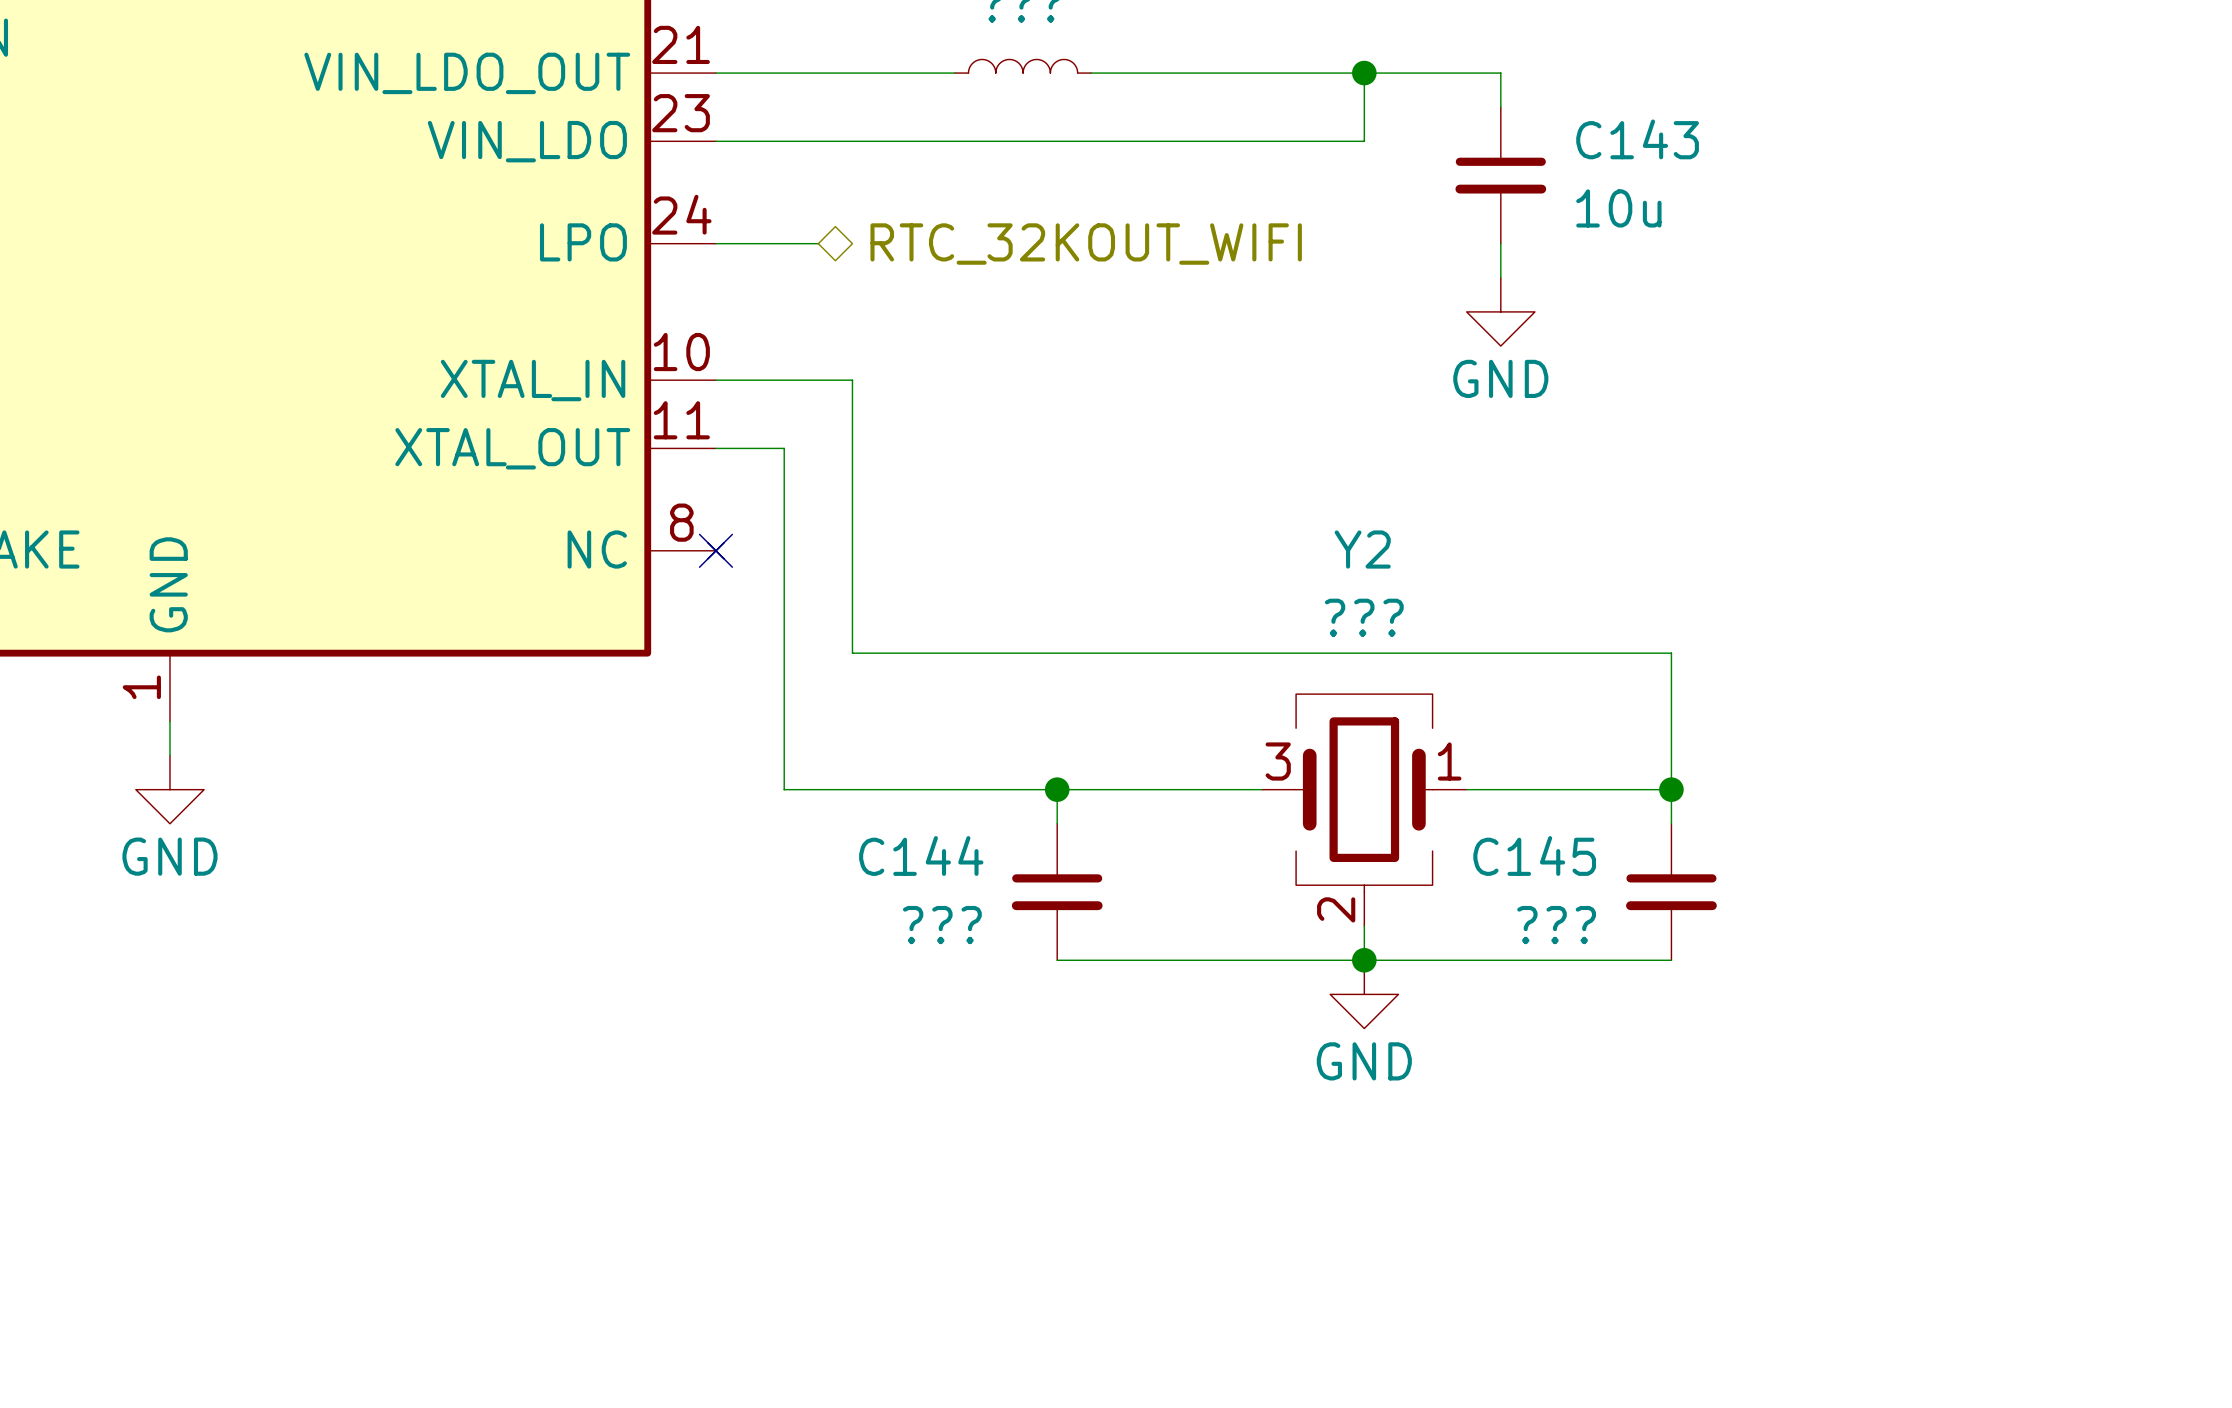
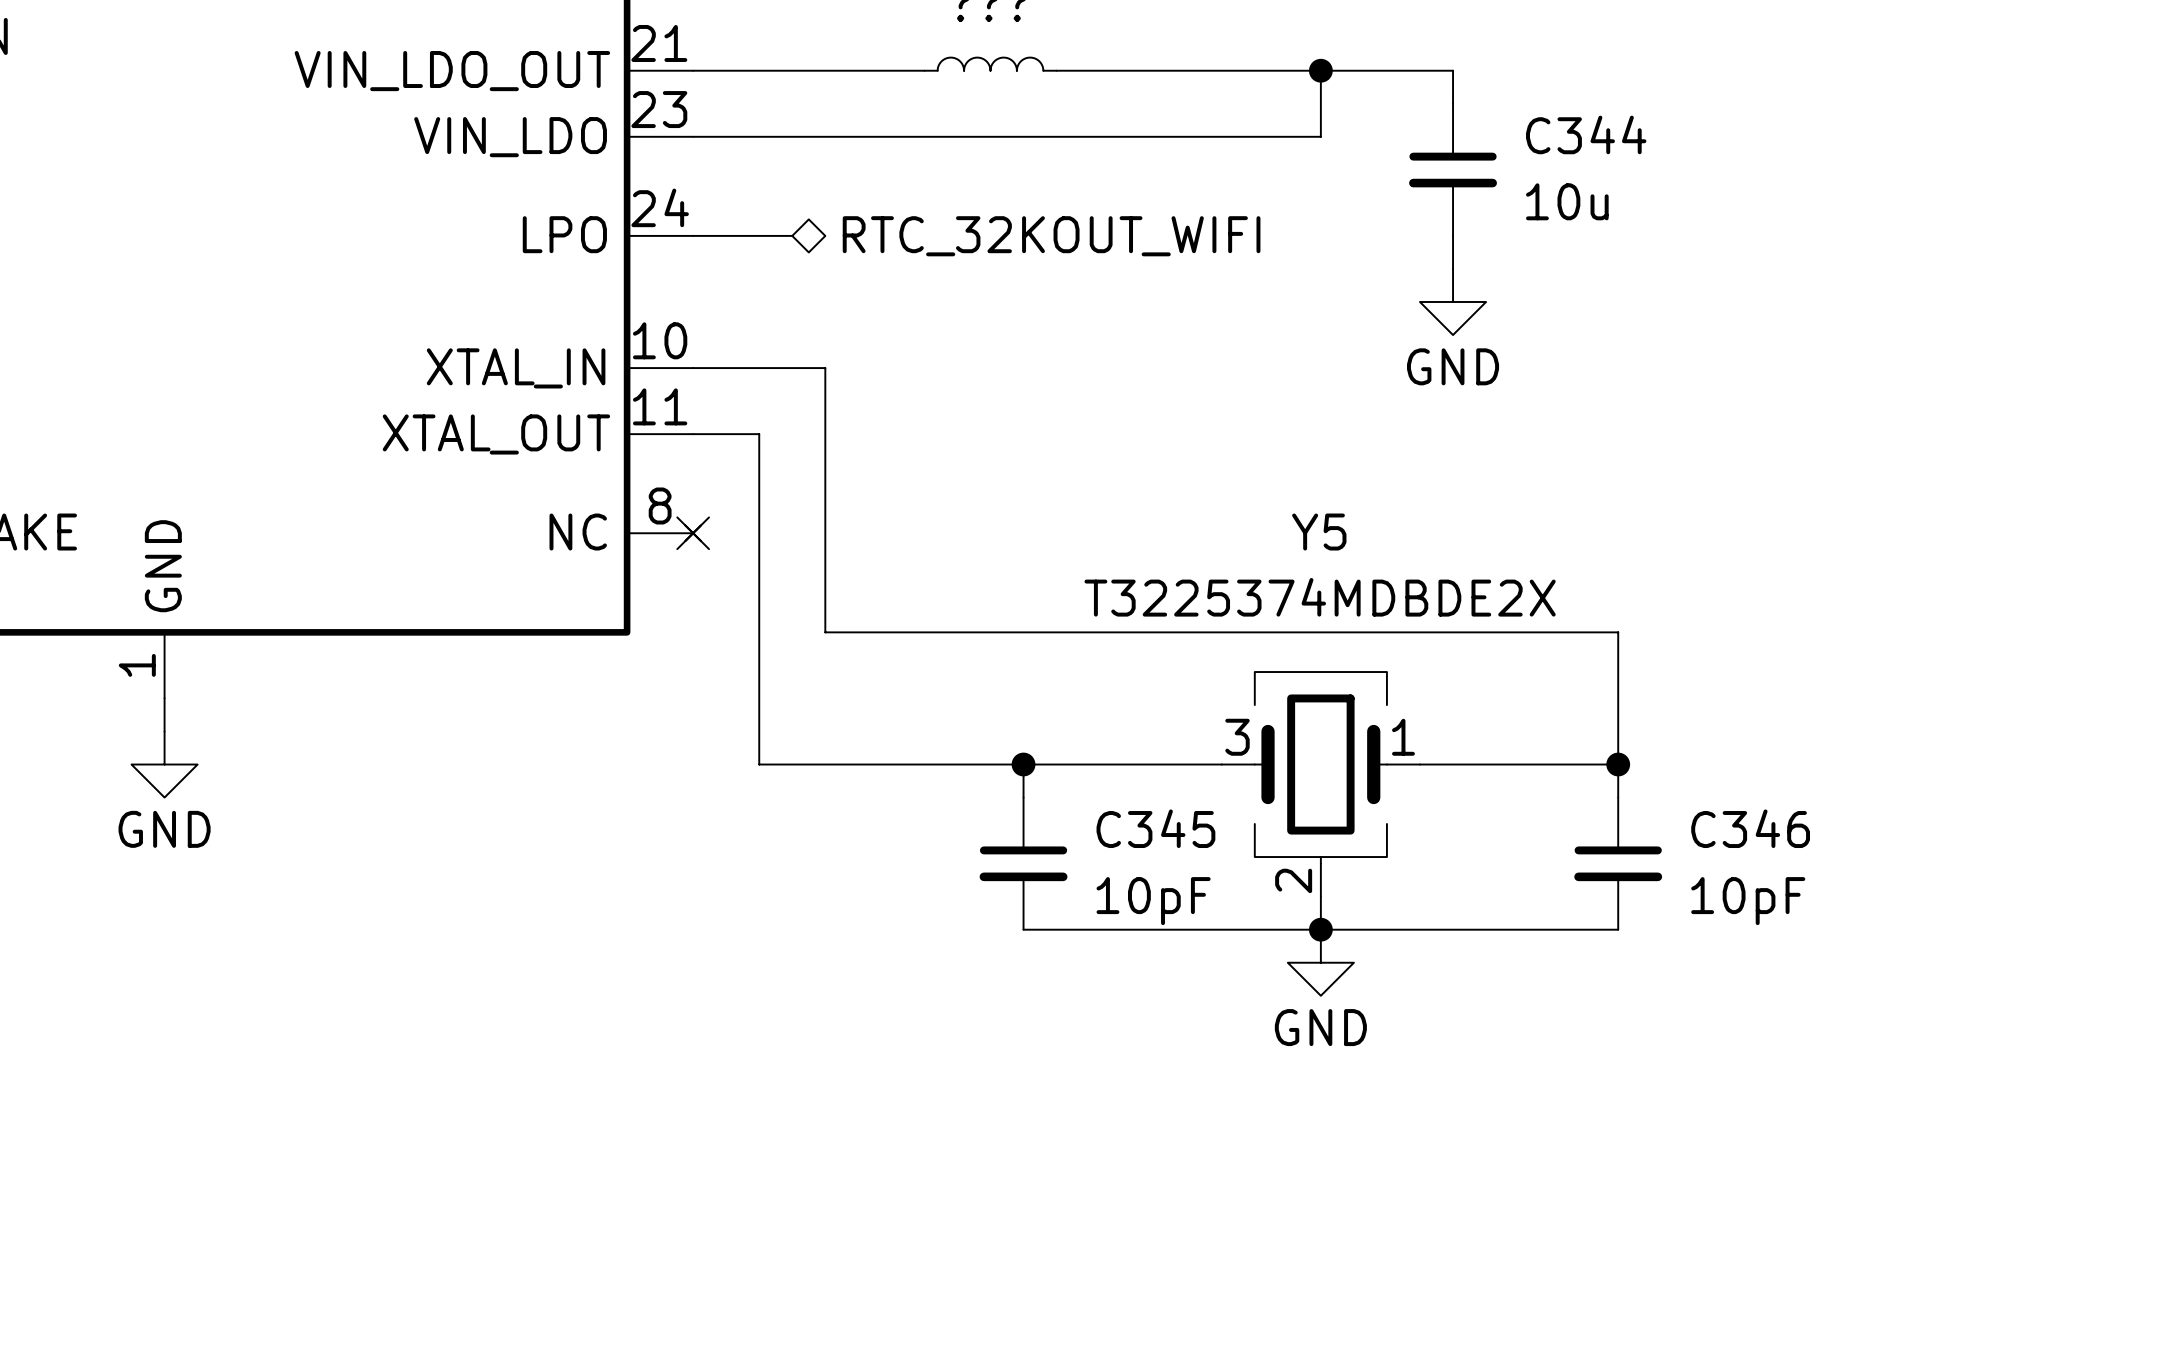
C143 name: C143 (1637, 139) -> C344 (1586, 134)
Y2 name: Y2 (1362, 549) -> Y5 (1319, 532)
Y2 value: ??? (1364, 617) -> T3225374MDBDE2X (1320, 597)
C144 name: C144 (921, 855) -> C345 (1155, 828)
C145 name: C145 (1534, 855) -> C346 (1750, 828)
C144 value: ??? (942, 925) -> 10pF (1153, 901)
C145 value: ??? (1556, 925) -> 10pF (1748, 901)

